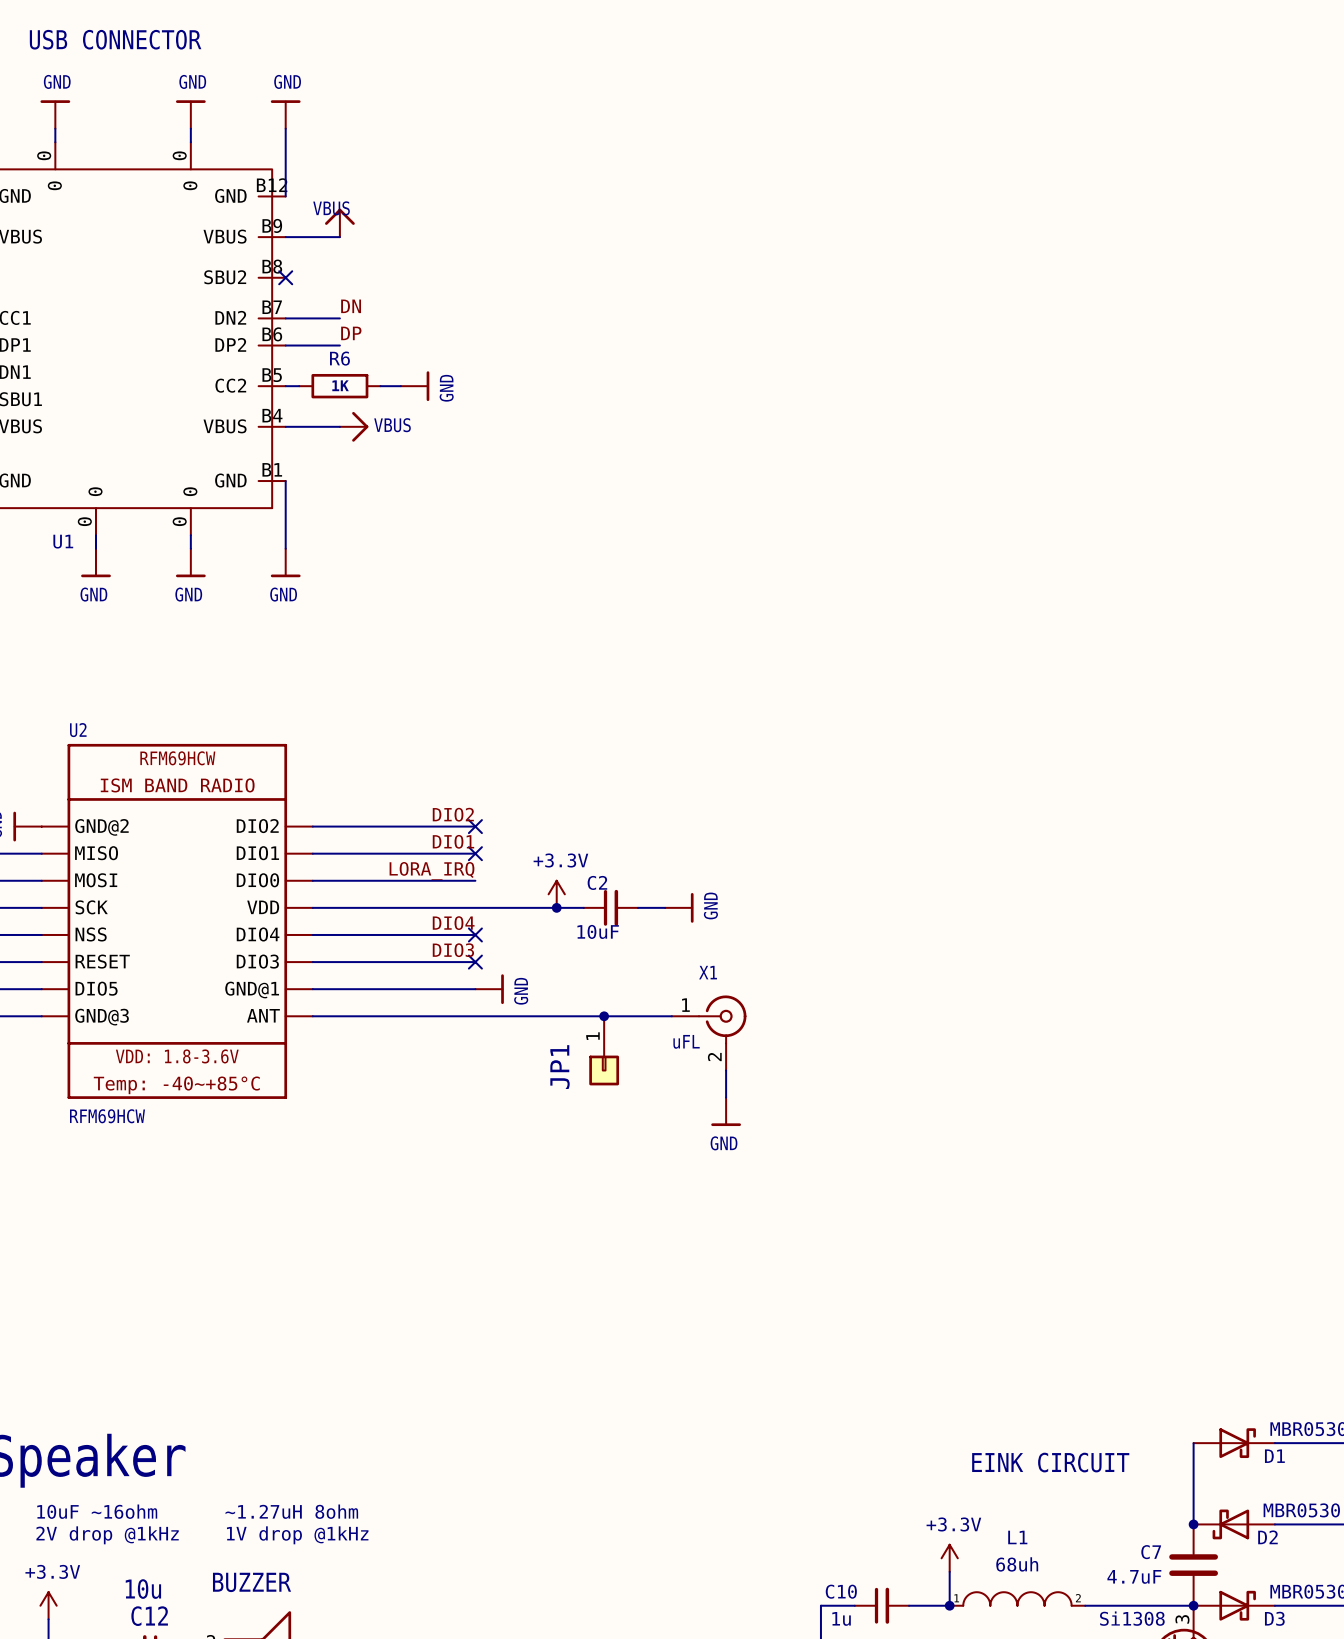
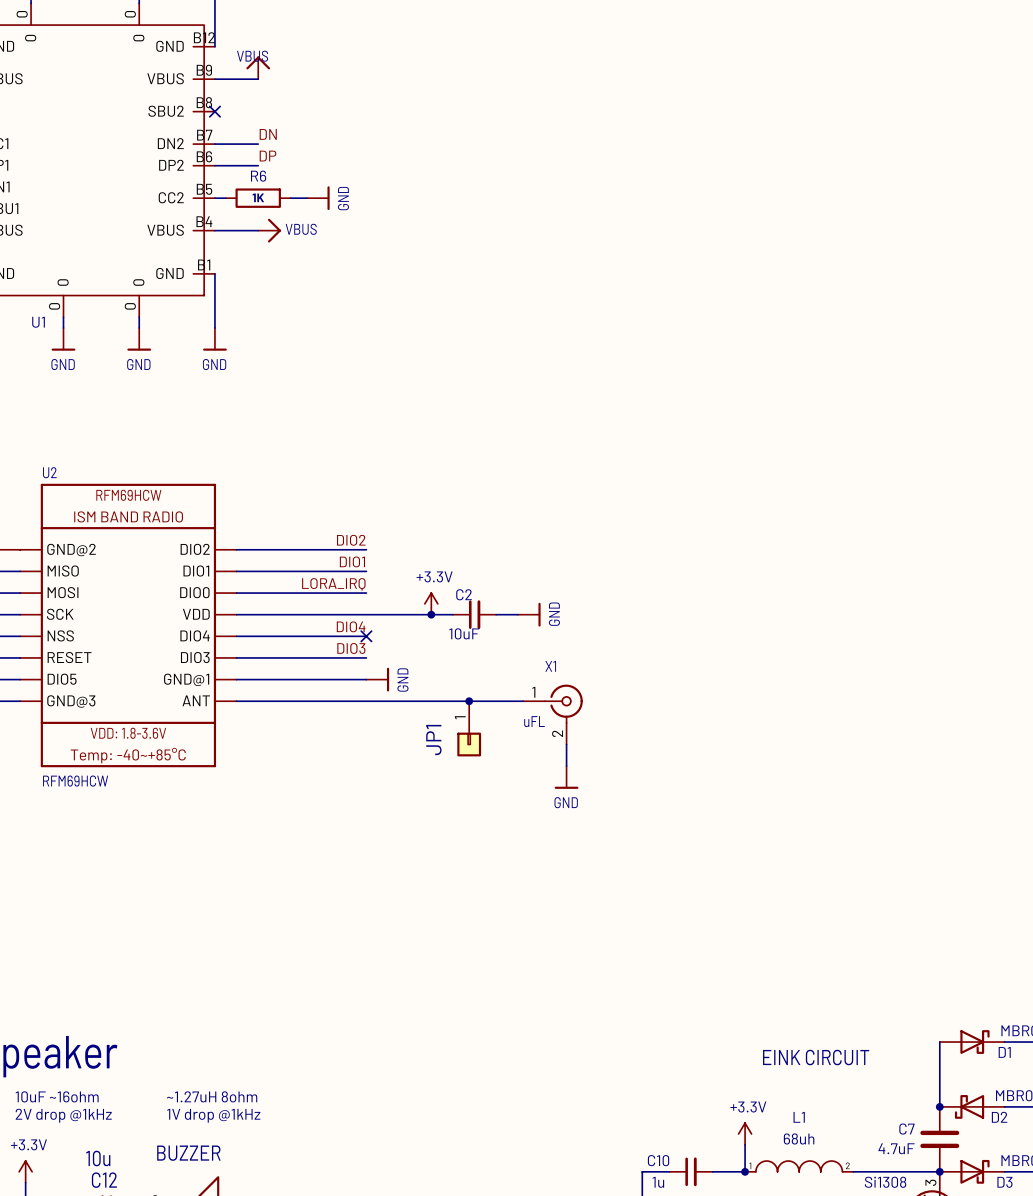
no-connect mark: (475, 826) -> none
no-connect mark: (475, 853) -> none
no-connect mark: (475, 962) -> none

